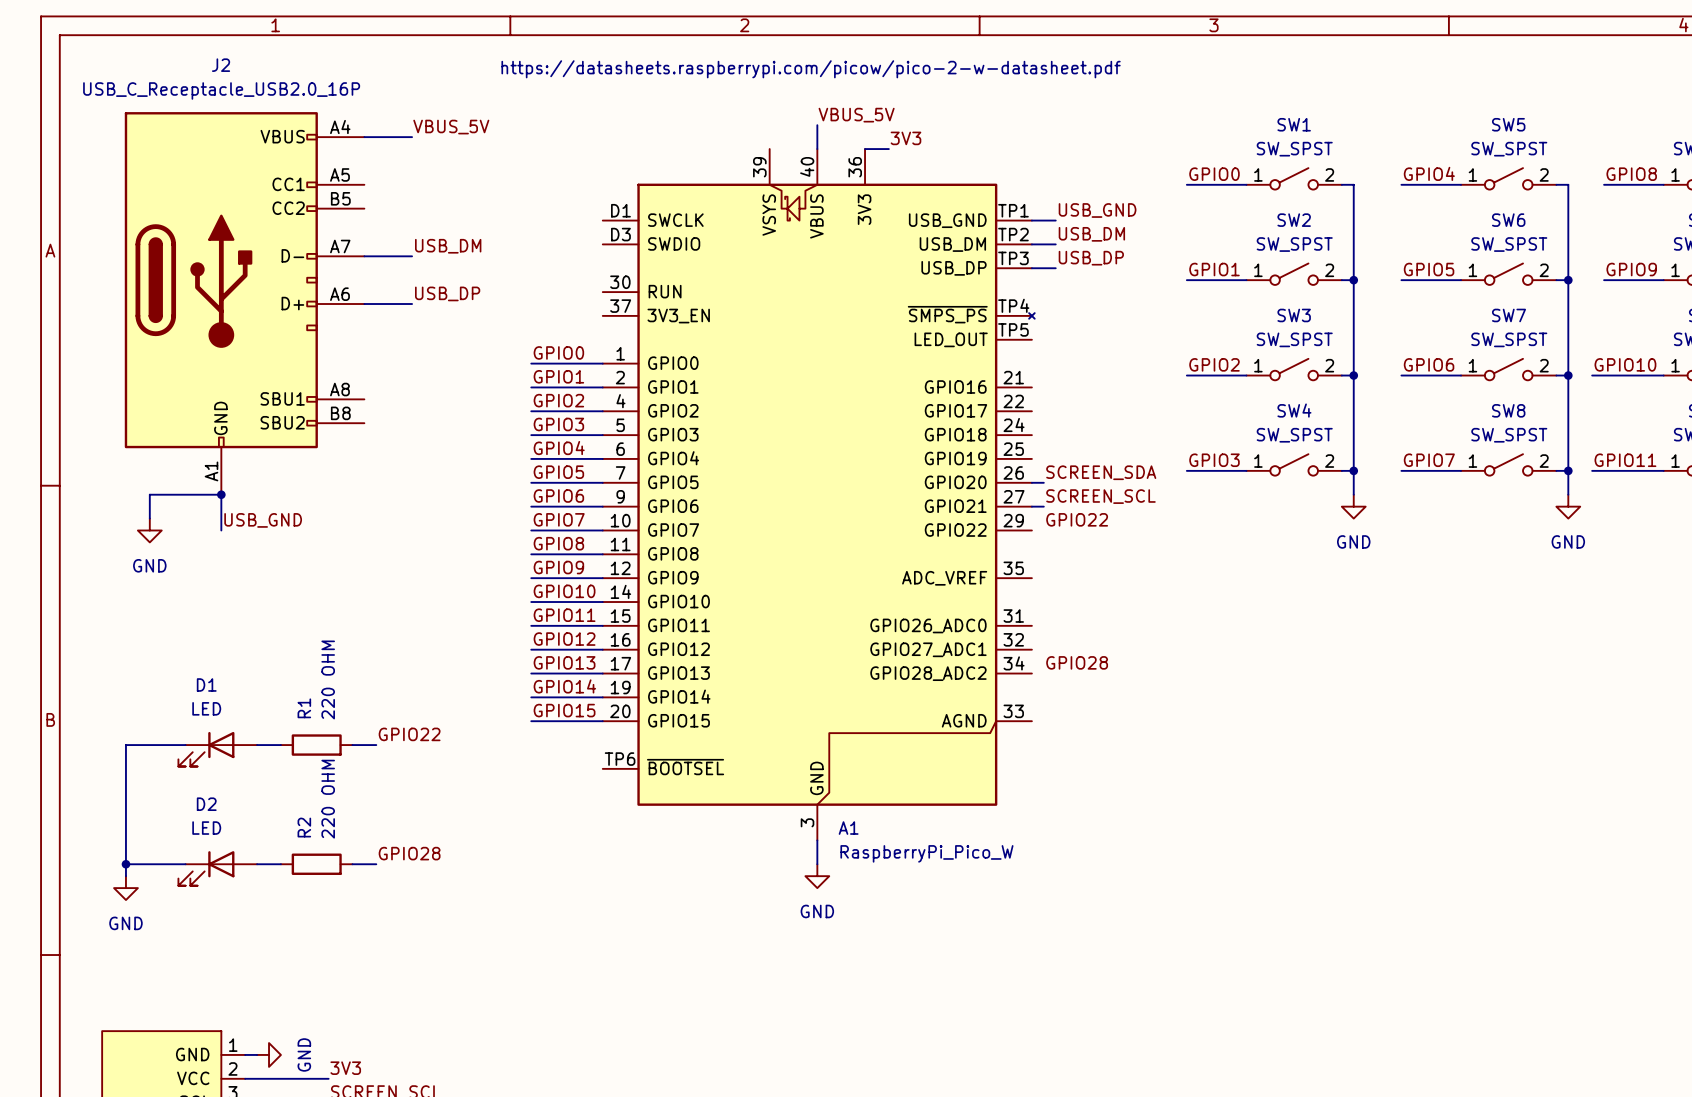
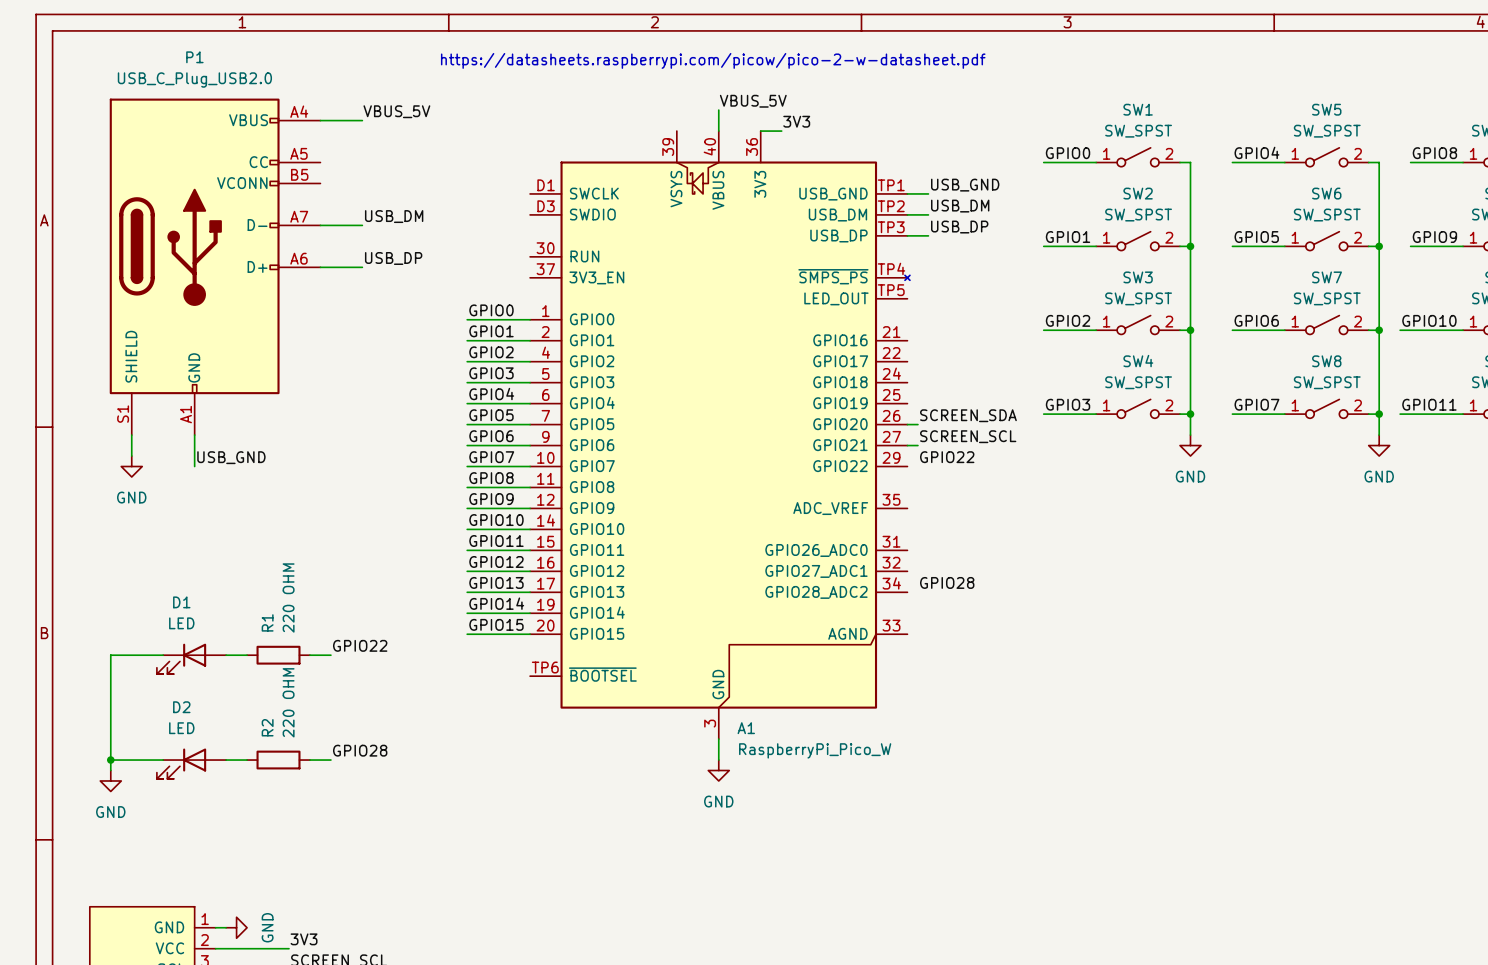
J2: USB_C_Receptacle_USB2.0_16P (244, 303) -> none
P1: none -> USB_C_Plug_USB2.0 (215, 266)
wire: (149, 494) (221, 494) -> none
junction: (221, 494) -> none

